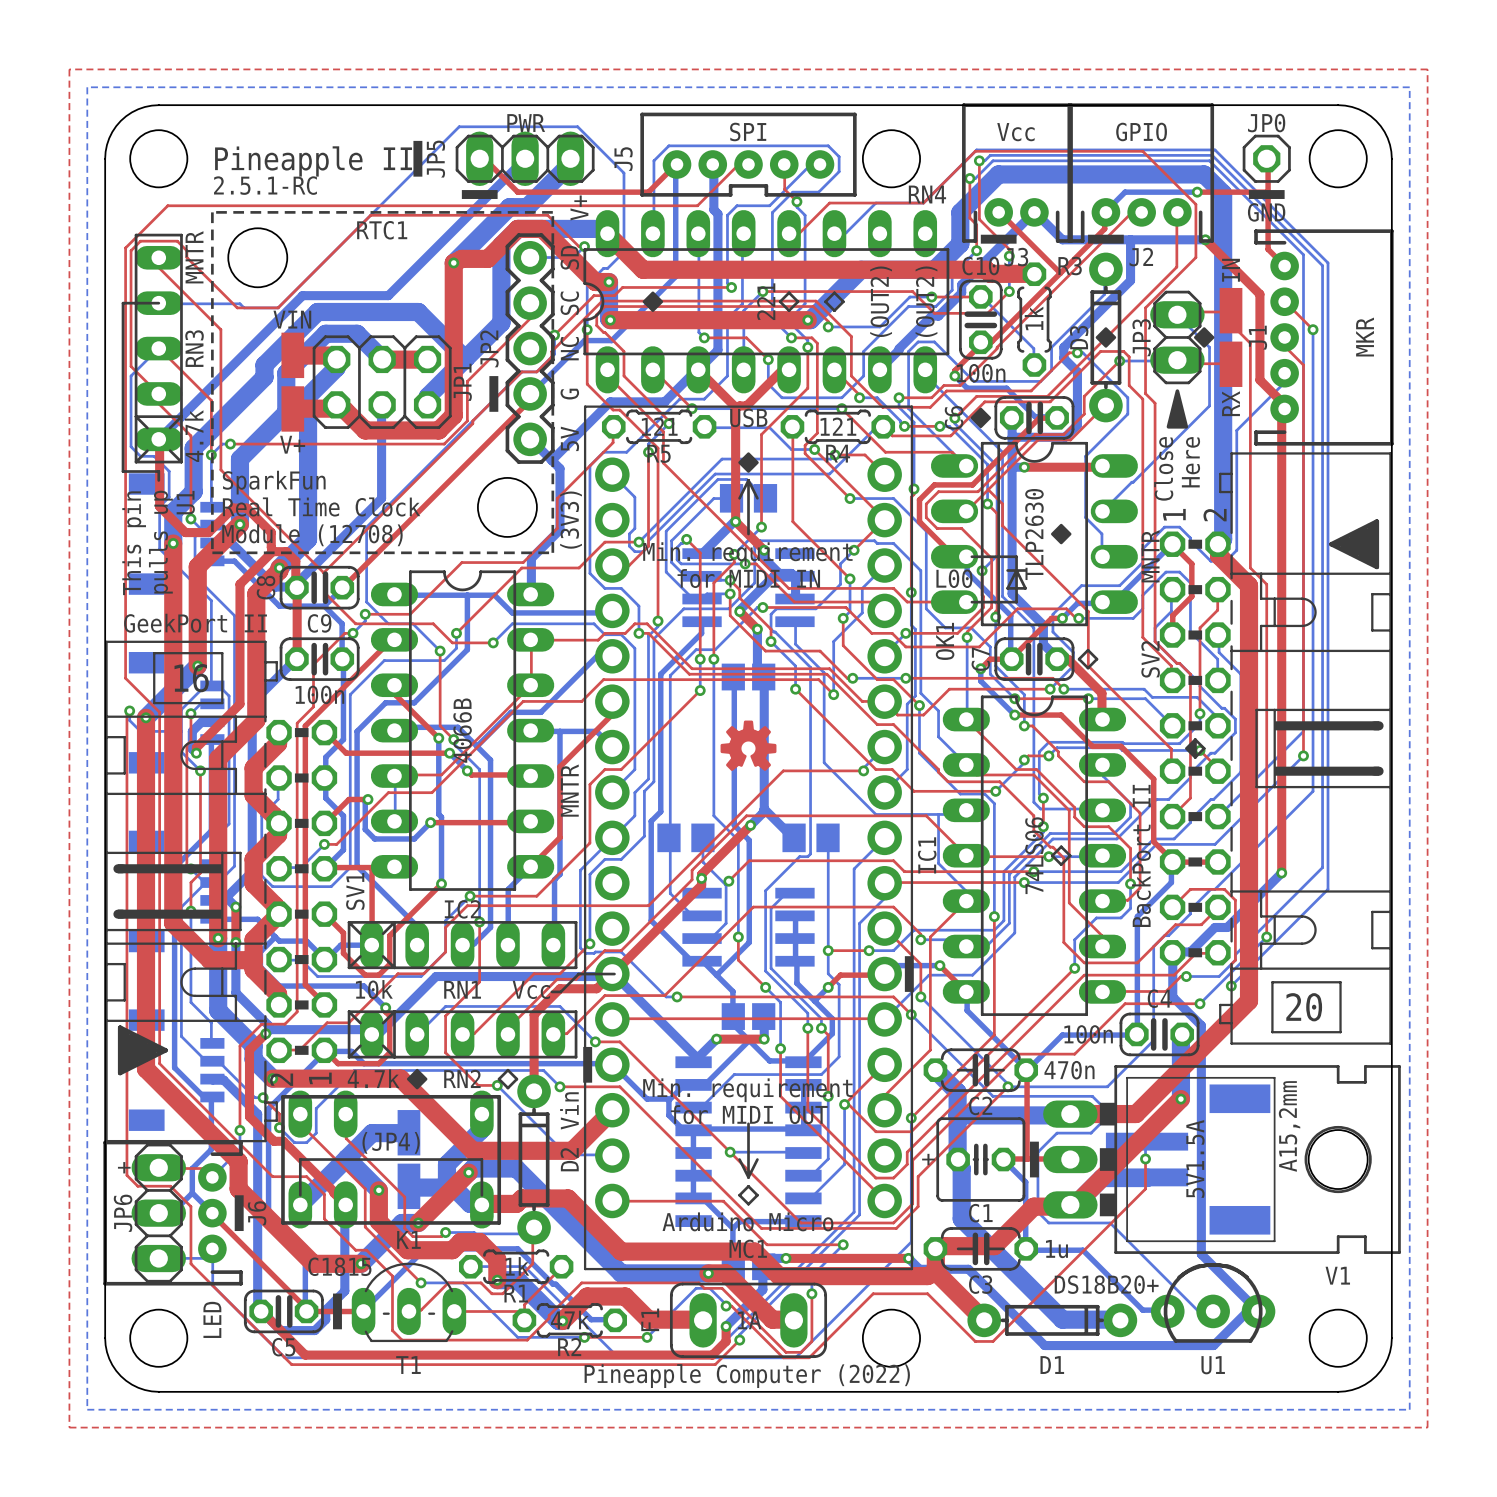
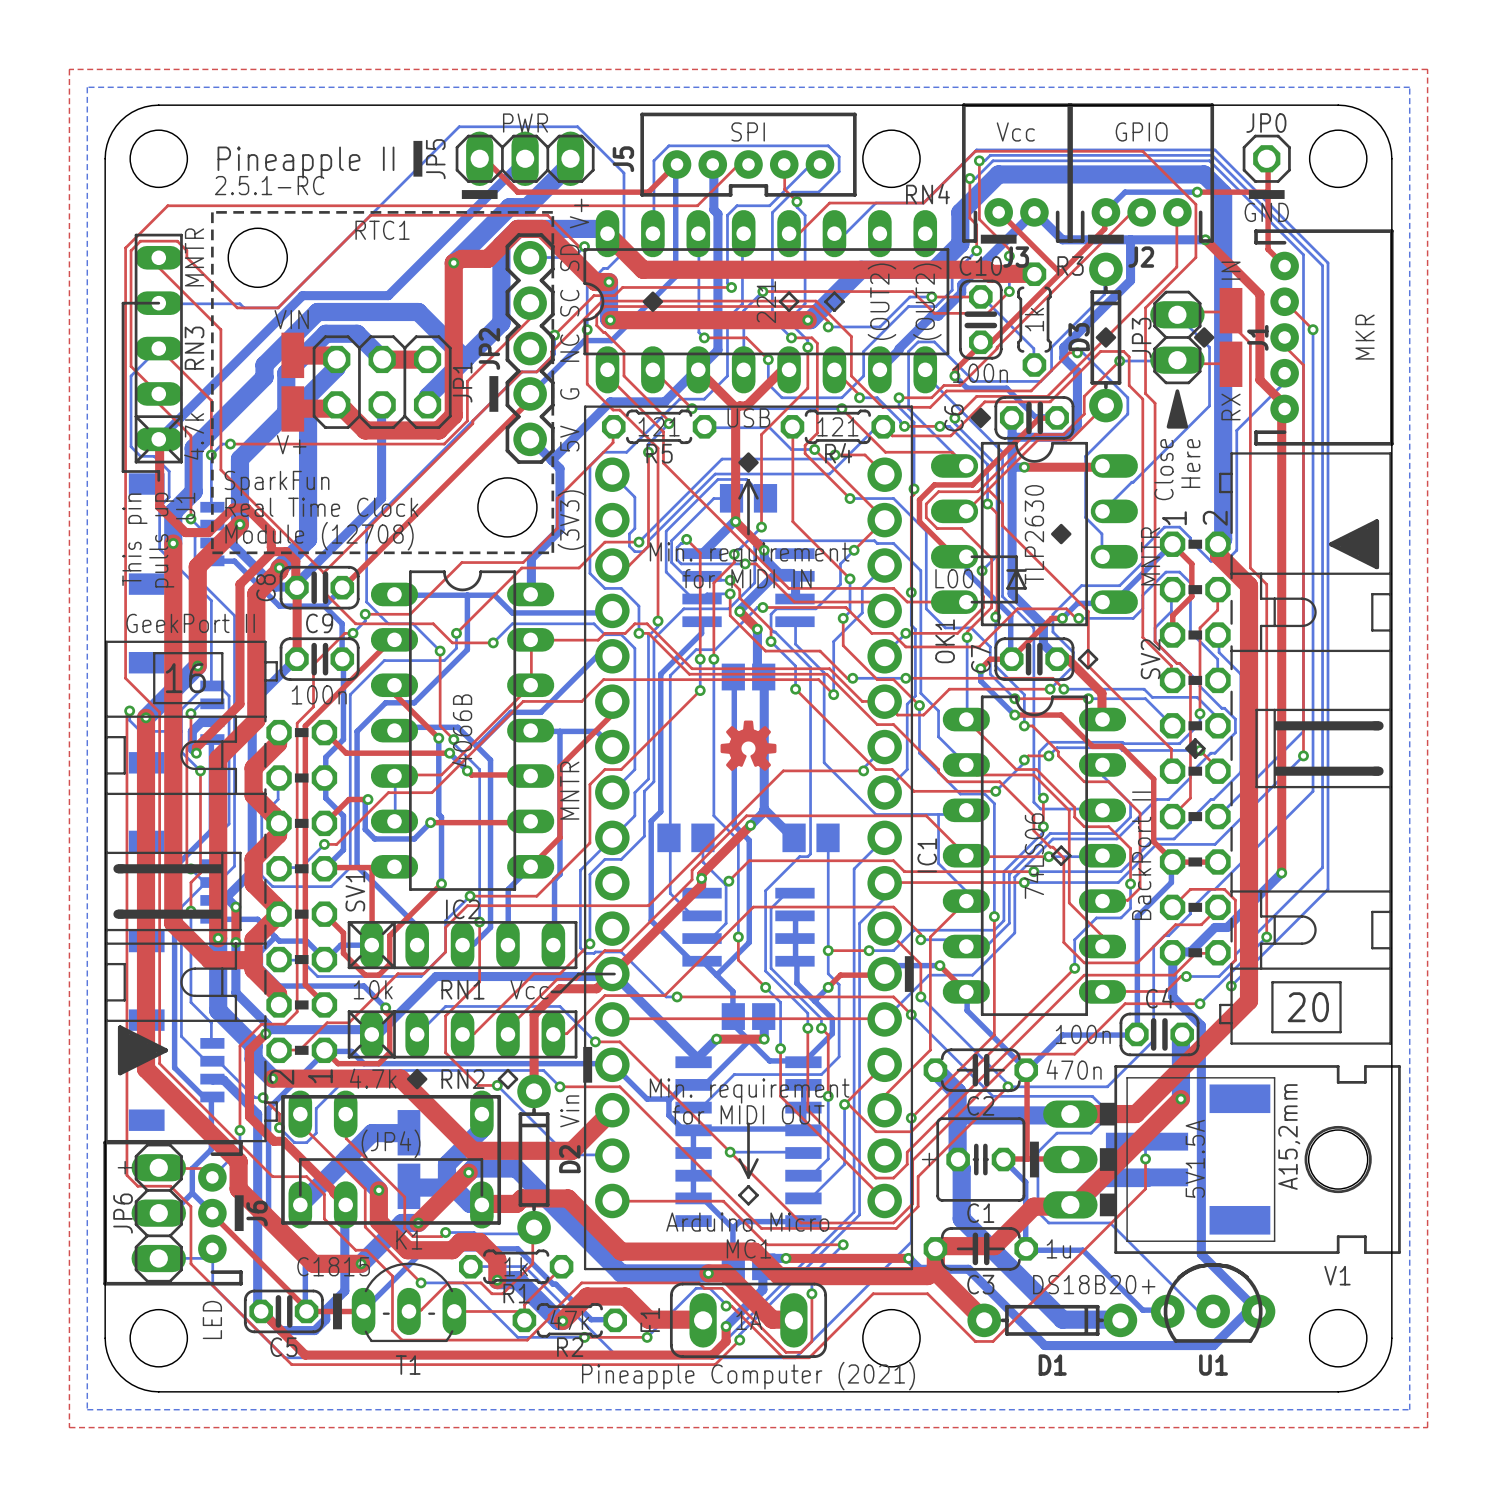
text: Pineapple Computer (2022) (747, 1376) -> Pineapple Computer (2021) (748, 1376)

